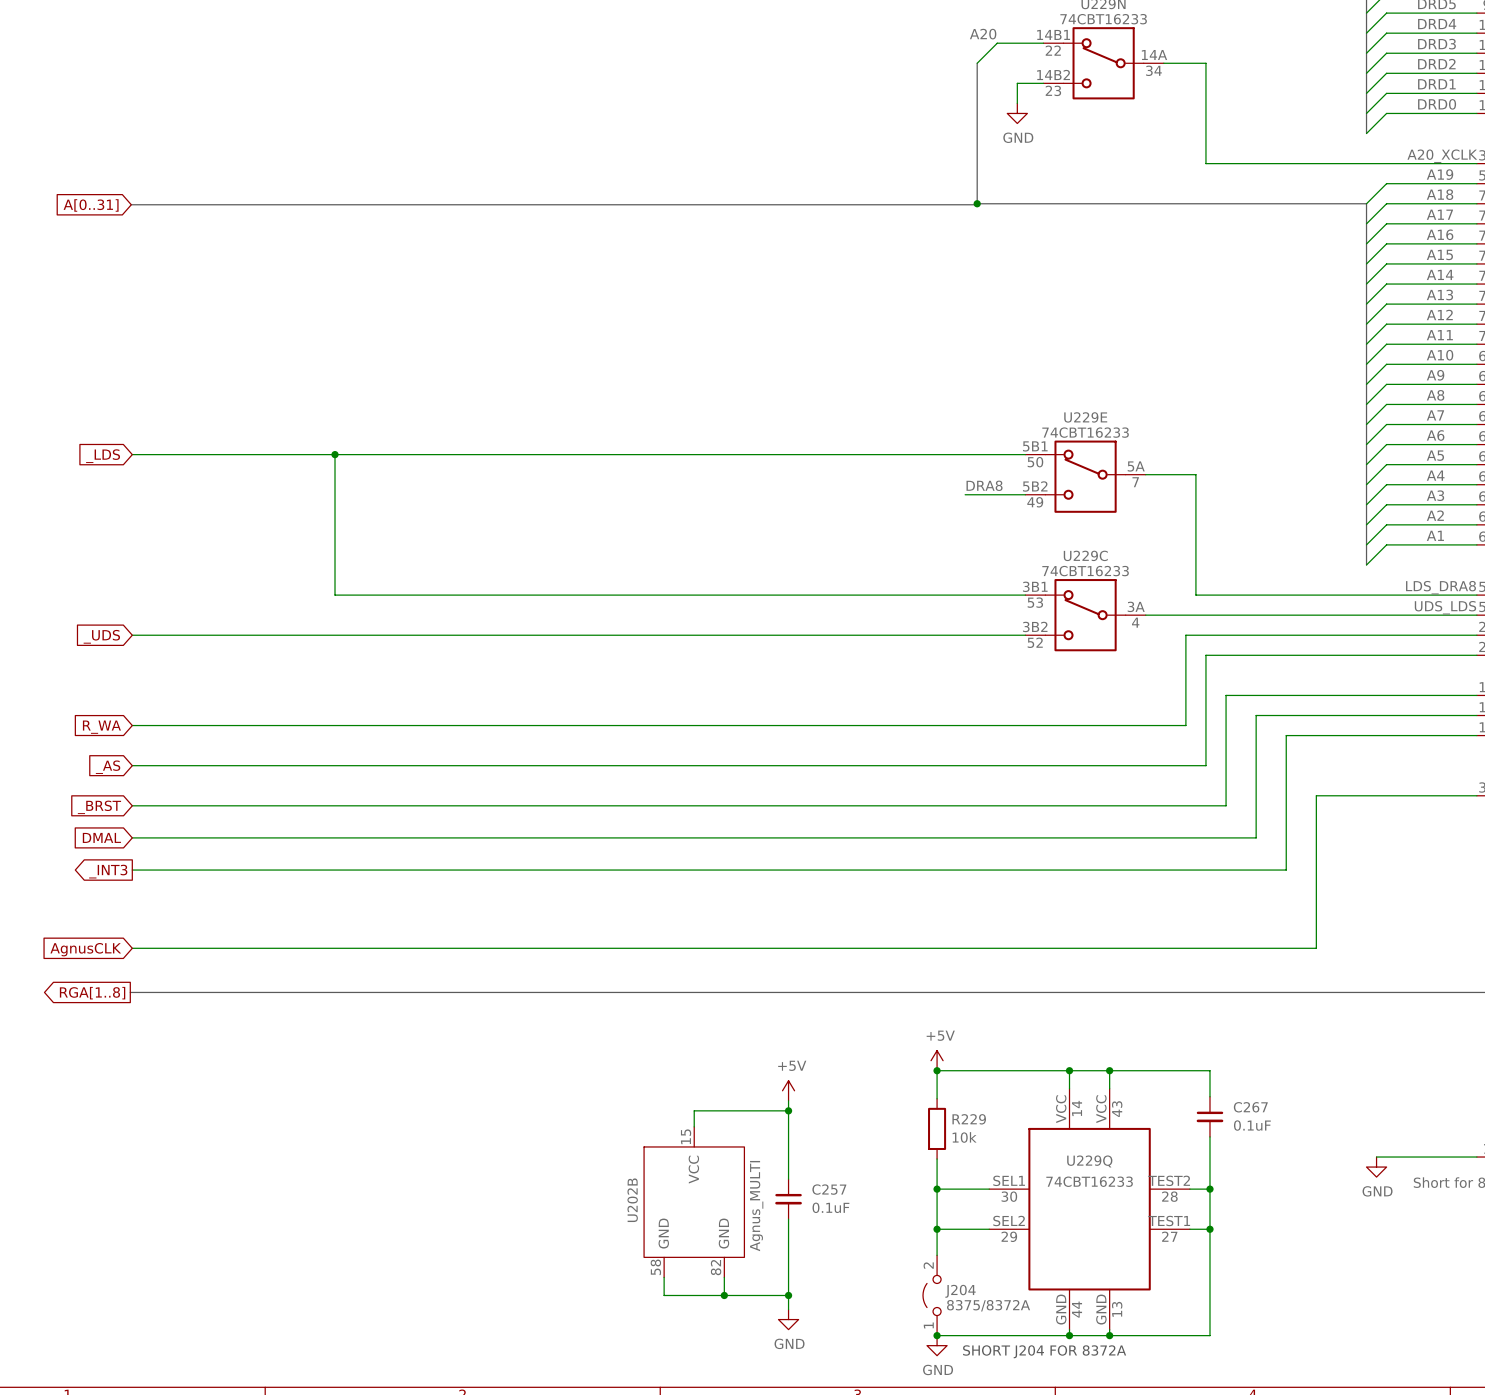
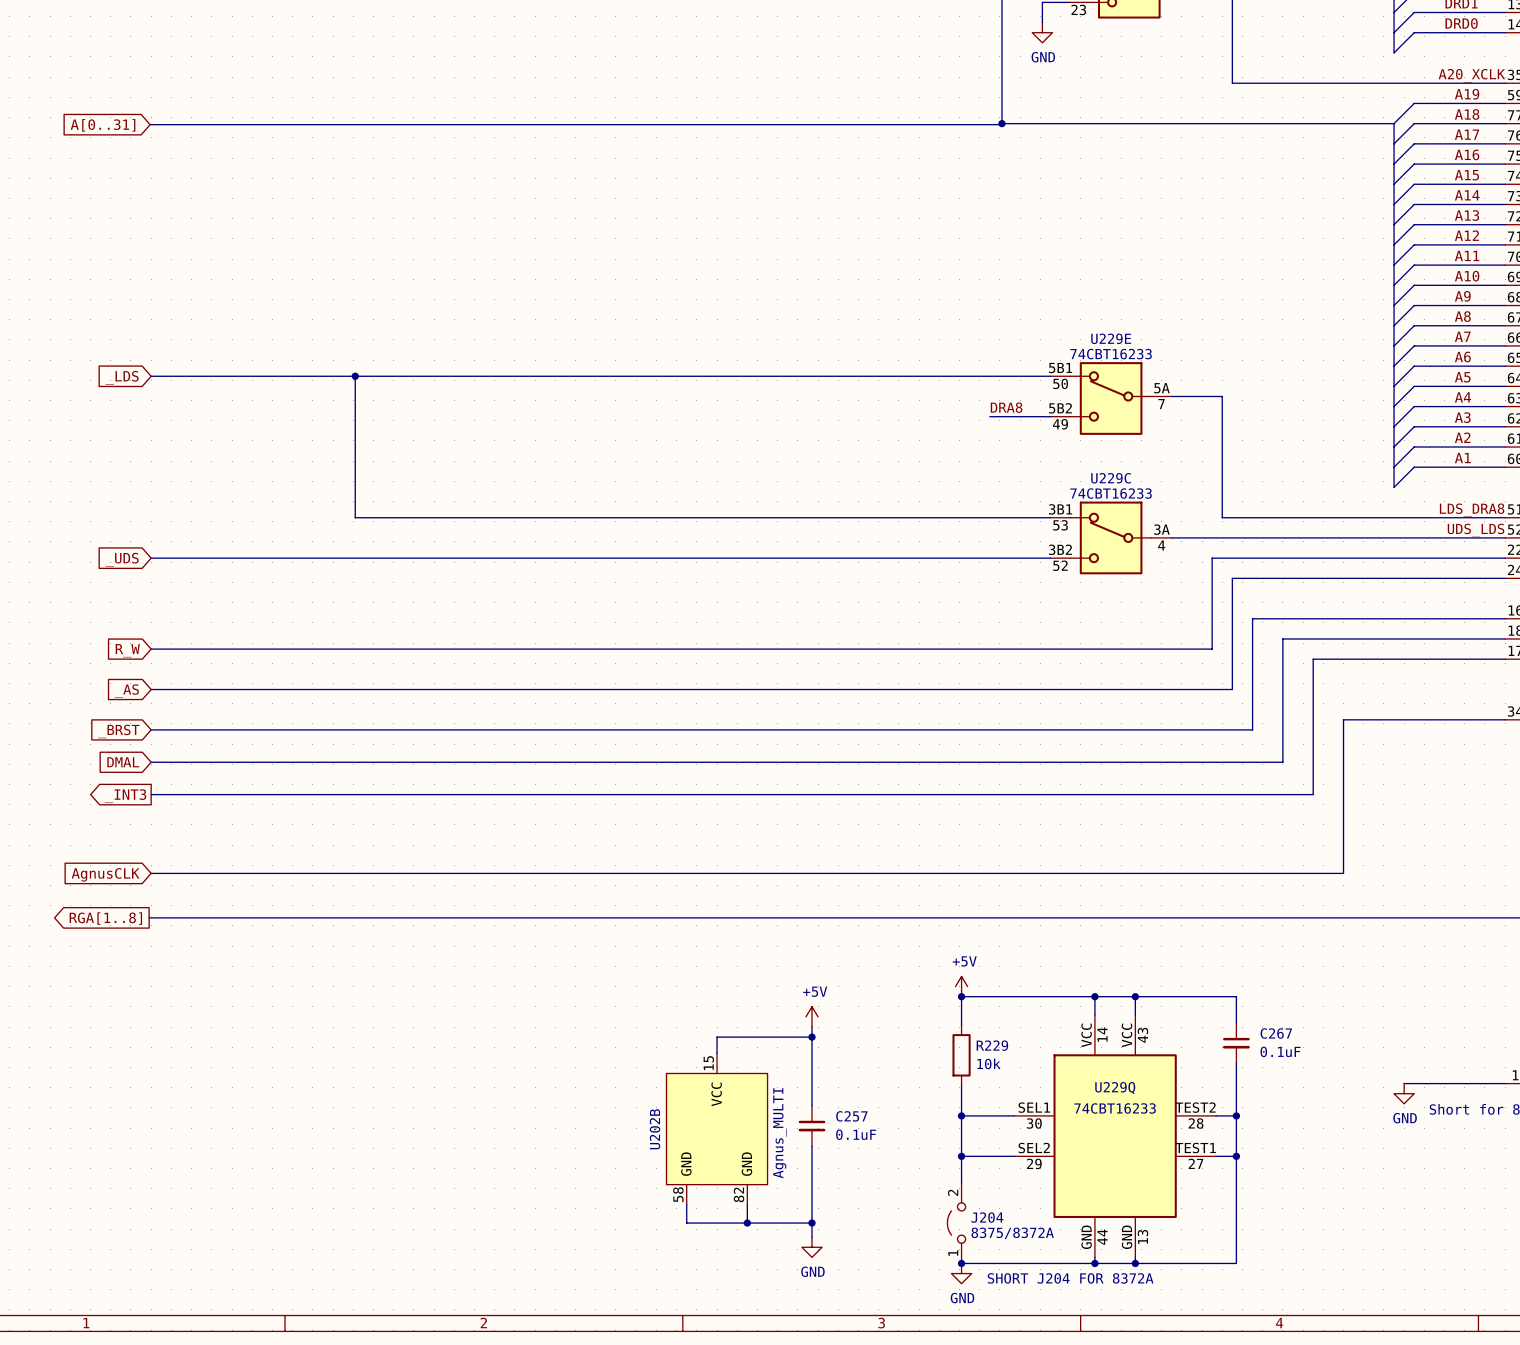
global label: R_WA (101, 727) -> R_W (127, 650)

